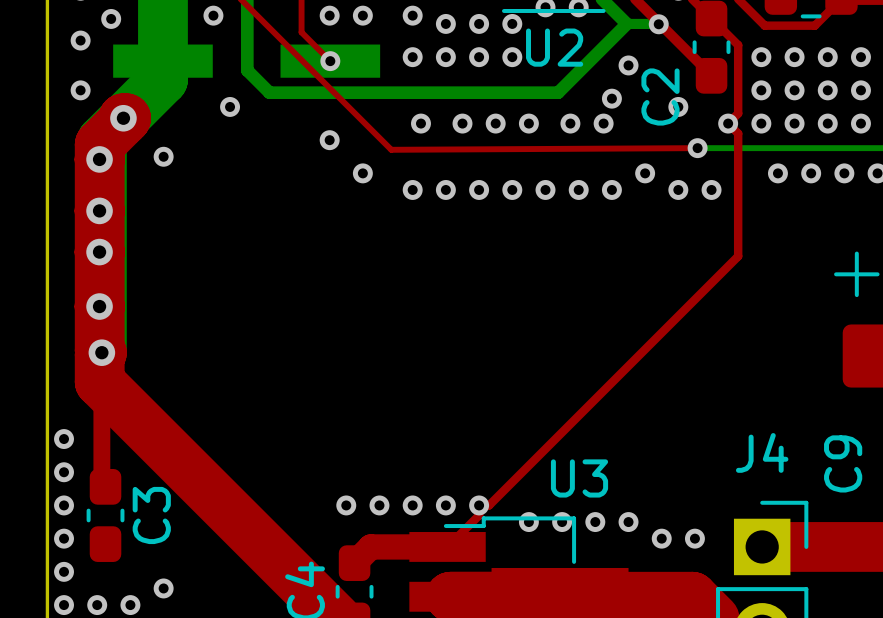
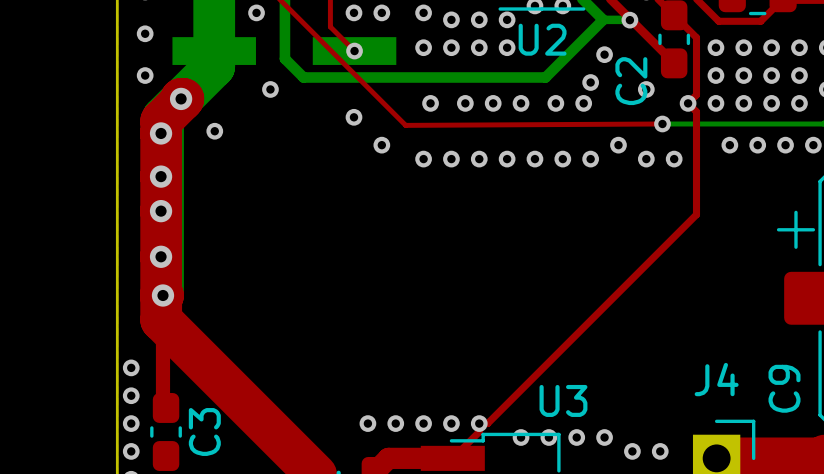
via: (111, 18) -> none

